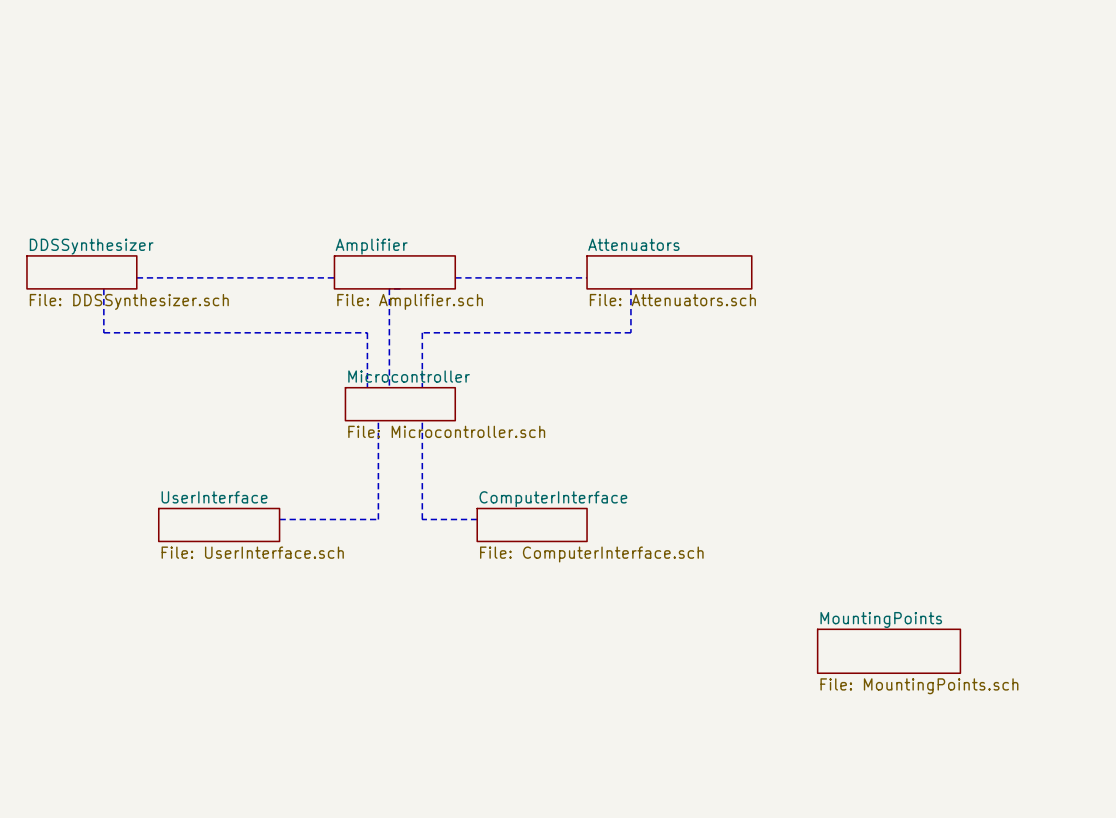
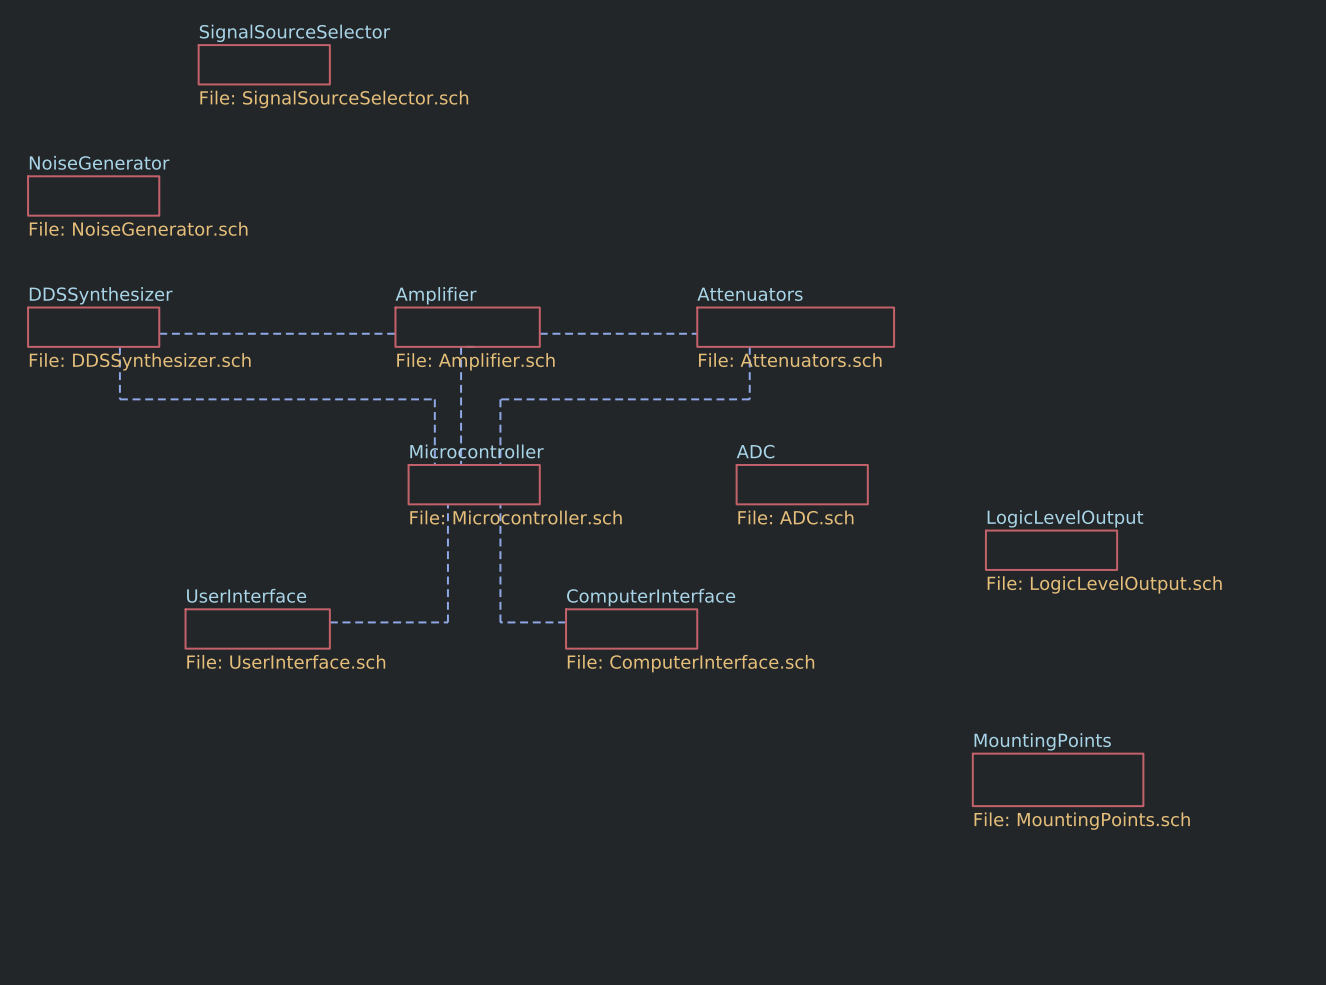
sheet SignalSourceSelector: none -> File: SignalSourceSelector.sch (264, 64)
sheet NoiseGenerator: none -> File: NoiseGenerator.sch (93, 195)
sheet ADC: none -> File: ADC.sch (802, 484)
sheet LogicLevelOutput: none -> File: LogicLevelOutput.sch (1051, 550)

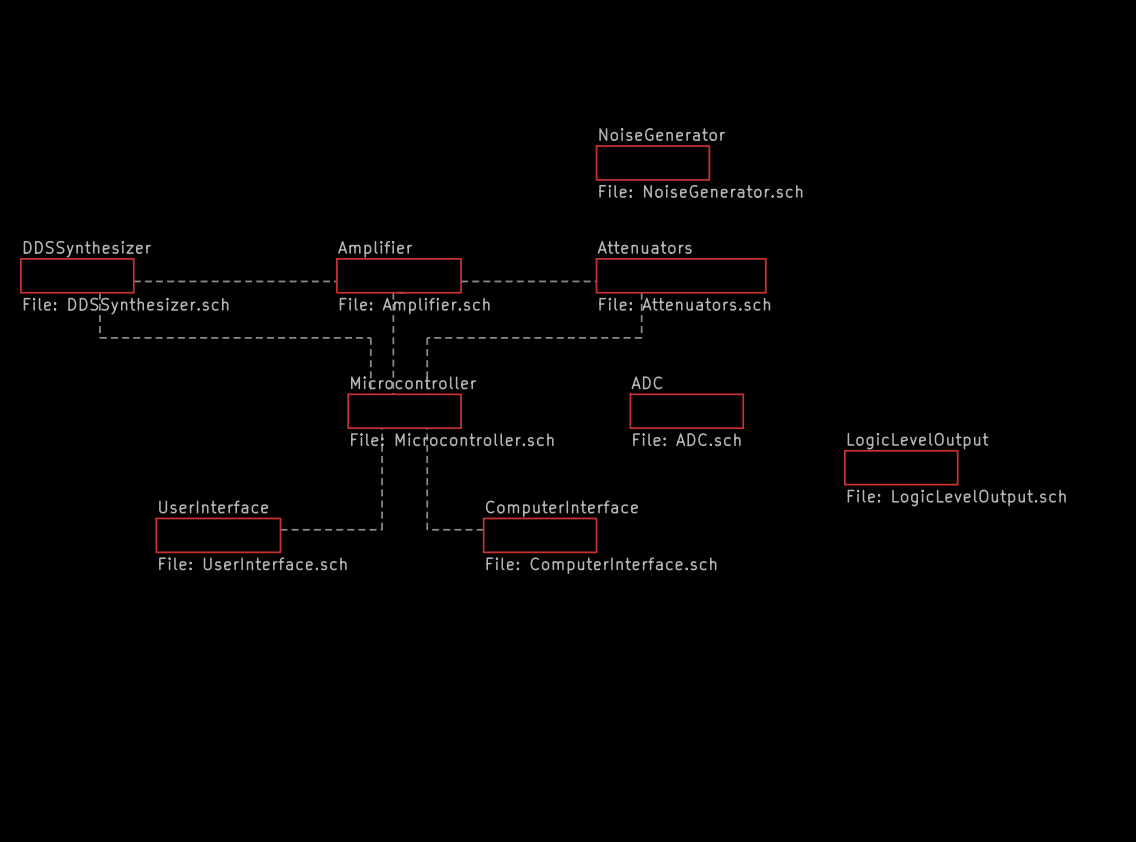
sheet SignalSourceSelector: File: SignalSourceSelector.sch (264, 64) -> none
sheet NoiseGenerator: File: NoiseGenerator.sch (93, 195) -> none
sheet NoiseGenerator: none -> File: NoiseGenerator.sch (652, 162)
sheet MountingPoints: File: MountingPoints.sch (1058, 779) -> none

